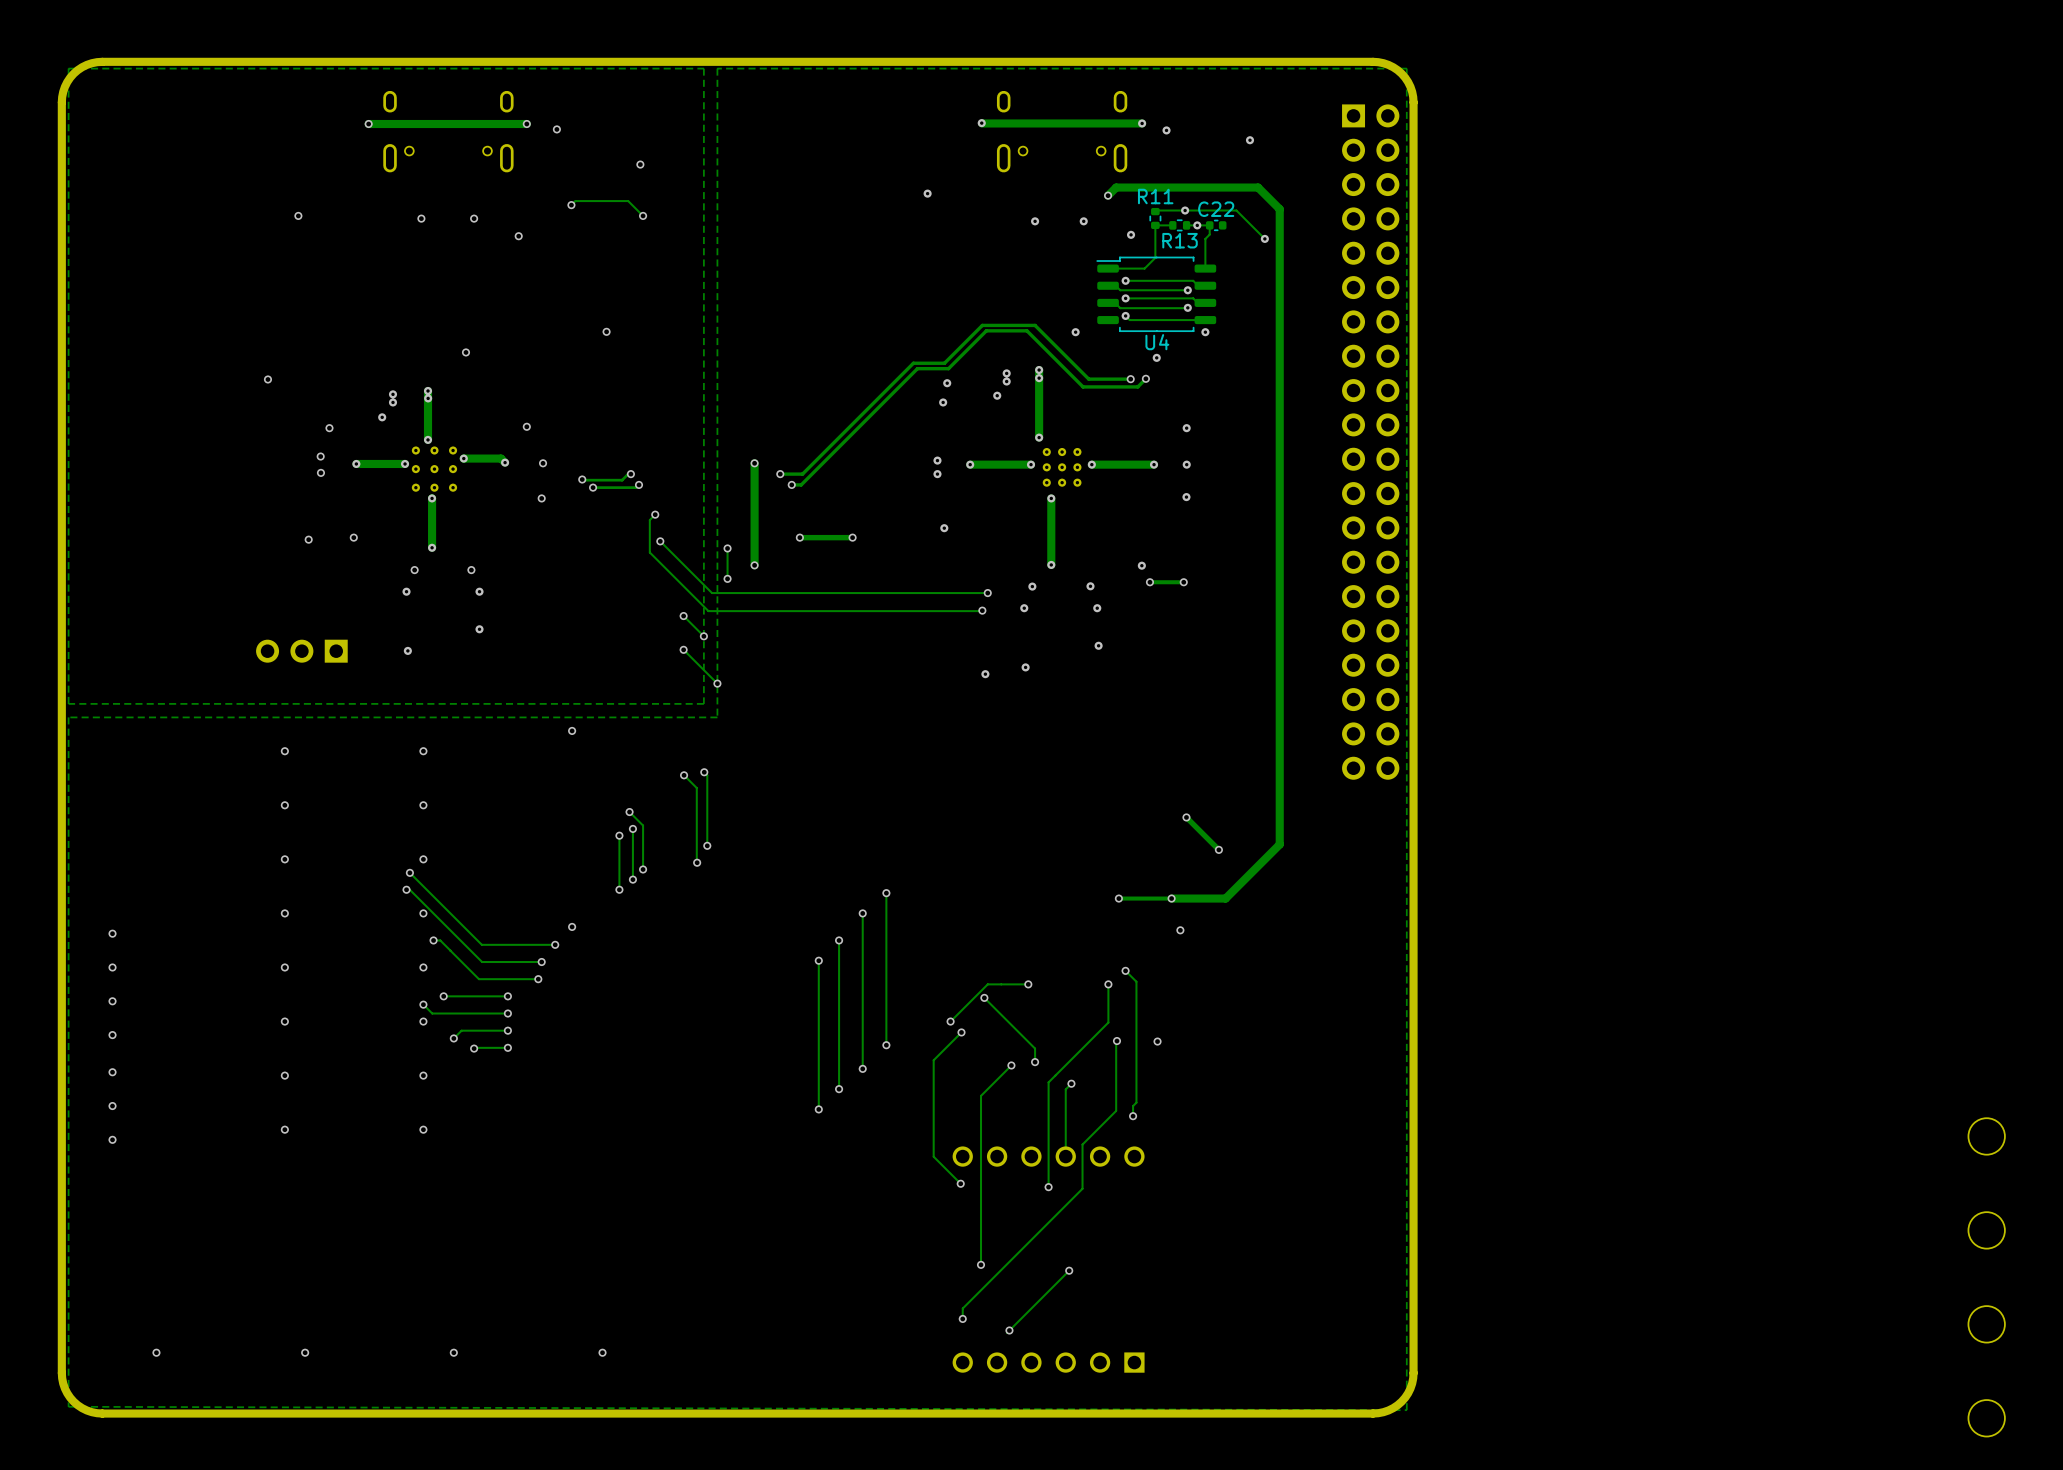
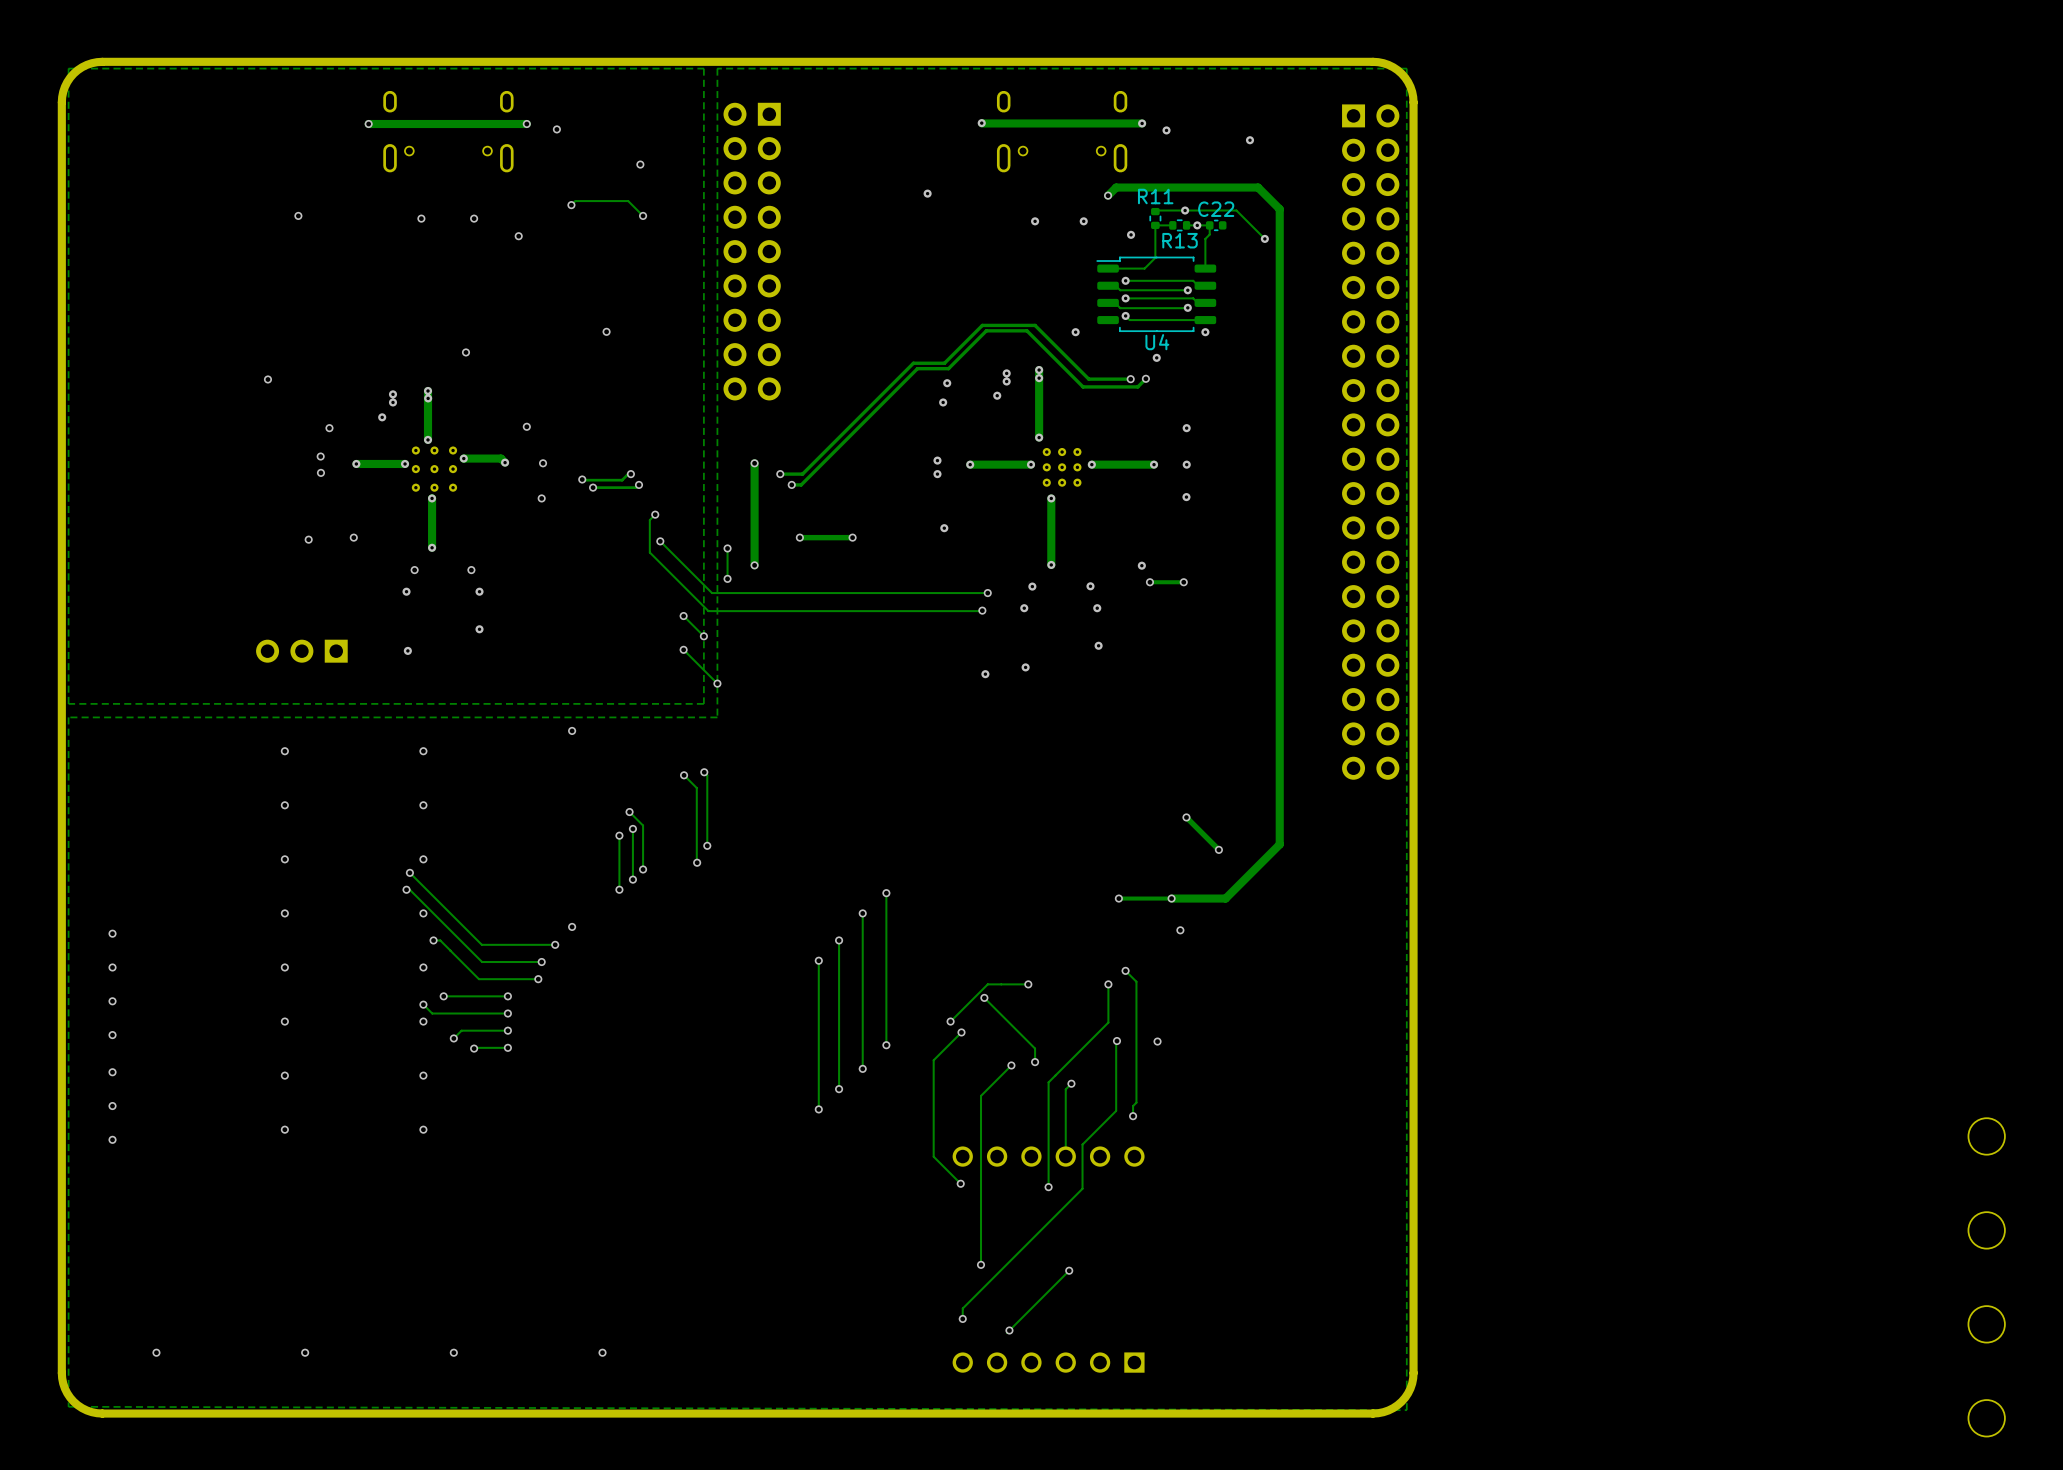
part: none -> (752, 251)

